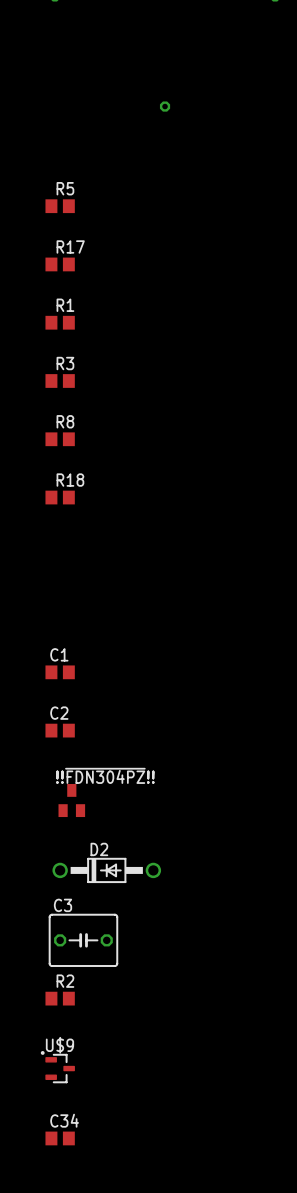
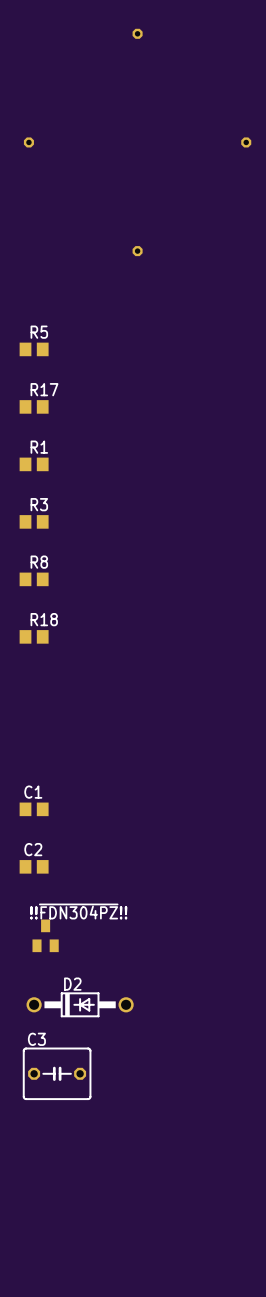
R2: (60, 998) -> none
U$9: (57, 1067) -> none
C34: (60, 1138) -> none

